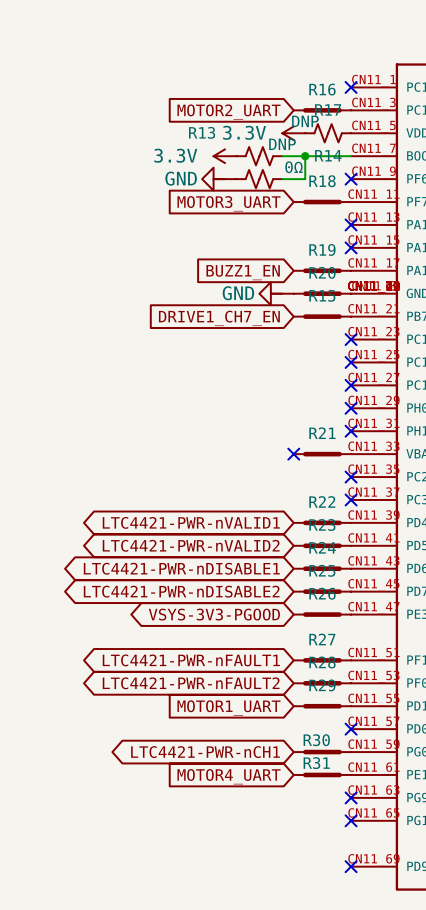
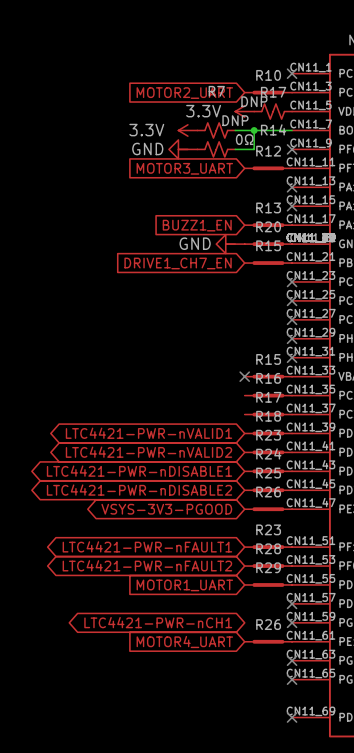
R16 name: R16 (322, 89) -> R10 (268, 75)
R13 name: R13 (202, 132) -> R7 (216, 91)
R18 name: R18 (322, 181) -> R12 (268, 151)
R19 name: R19 (322, 249) -> R13 (268, 207)
R21 name: R21 (322, 433) -> R15 (268, 359)
R16: none -> (268, 395)
no-connect mark: (351, 477) -> none
R17: none -> (268, 414)
no-connect mark: (351, 499) -> none
R22 name: R22 (322, 501) -> R18 (268, 416)
R27 name: R27 (322, 639) -> R23 (268, 529)
R30: (322, 752) -> none
no-connect mark: none -> (292, 622)
R31 name: R31 (316, 763) -> R26 (268, 624)

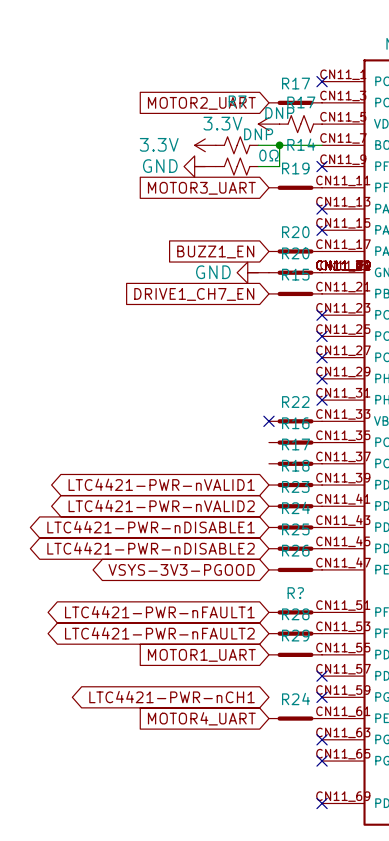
R10 name: R10 (268, 75) -> R17 (296, 83)
R12 name: R12 (268, 151) -> R19 (295, 168)
R13 name: R13 (268, 207) -> R20 (295, 232)
R15 name: R15 (268, 359) -> R22 (295, 402)
R23 name: R23 (268, 529) -> R? (295, 593)
R26 name: R26 (268, 624) -> R24 (296, 699)

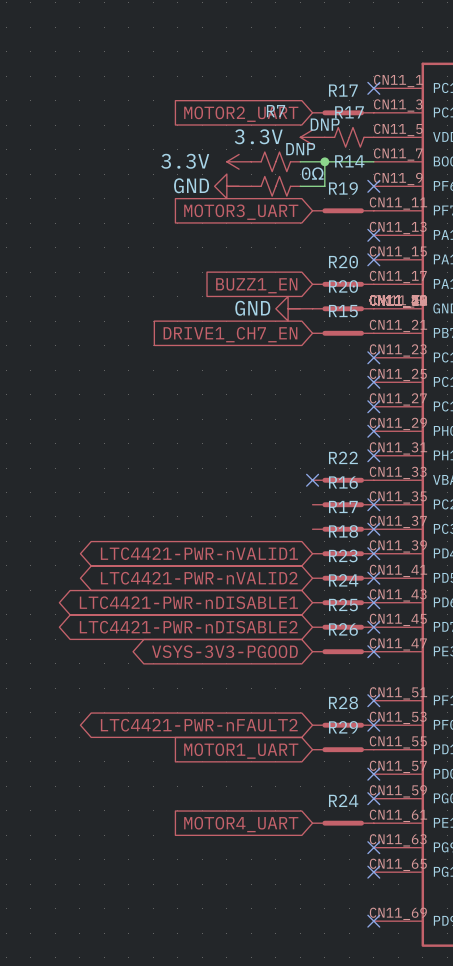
no-connect mark: none -> (373, 504)
no-connect mark: none -> (373, 529)
no-connect mark: none -> (373, 553)
no-connect mark: none -> (373, 578)
no-connect mark: none -> (373, 602)
no-connect mark: none -> (373, 627)
no-connect mark: none -> (373, 651)
global label: LTC4421-PWR-nFAULT1 (159, 612) -> none
R?: (295, 612) -> none
no-connect mark: none -> (373, 700)
no-connect mark: none -> (373, 725)
global label: LTC4421-PWR-nCH1 (172, 697) -> none

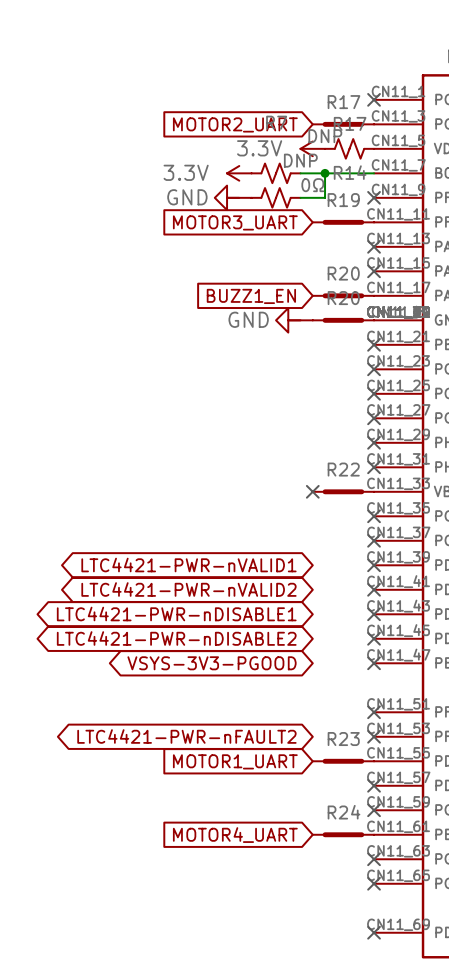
R15: (343, 333) -> none
no-connect mark: none -> (374, 344)
global label: DRIVE1_CH7_EN (230, 334) -> none
R16: (343, 504) -> none
R17: (343, 529) -> none
R18: (343, 553) -> none
R23: (343, 578) -> none
R24: (343, 602) -> none
R25: (343, 627) -> none
R26: (343, 651) -> none
R28: (343, 725) -> none
R29 name: R29 (343, 727) -> R23 (343, 739)

